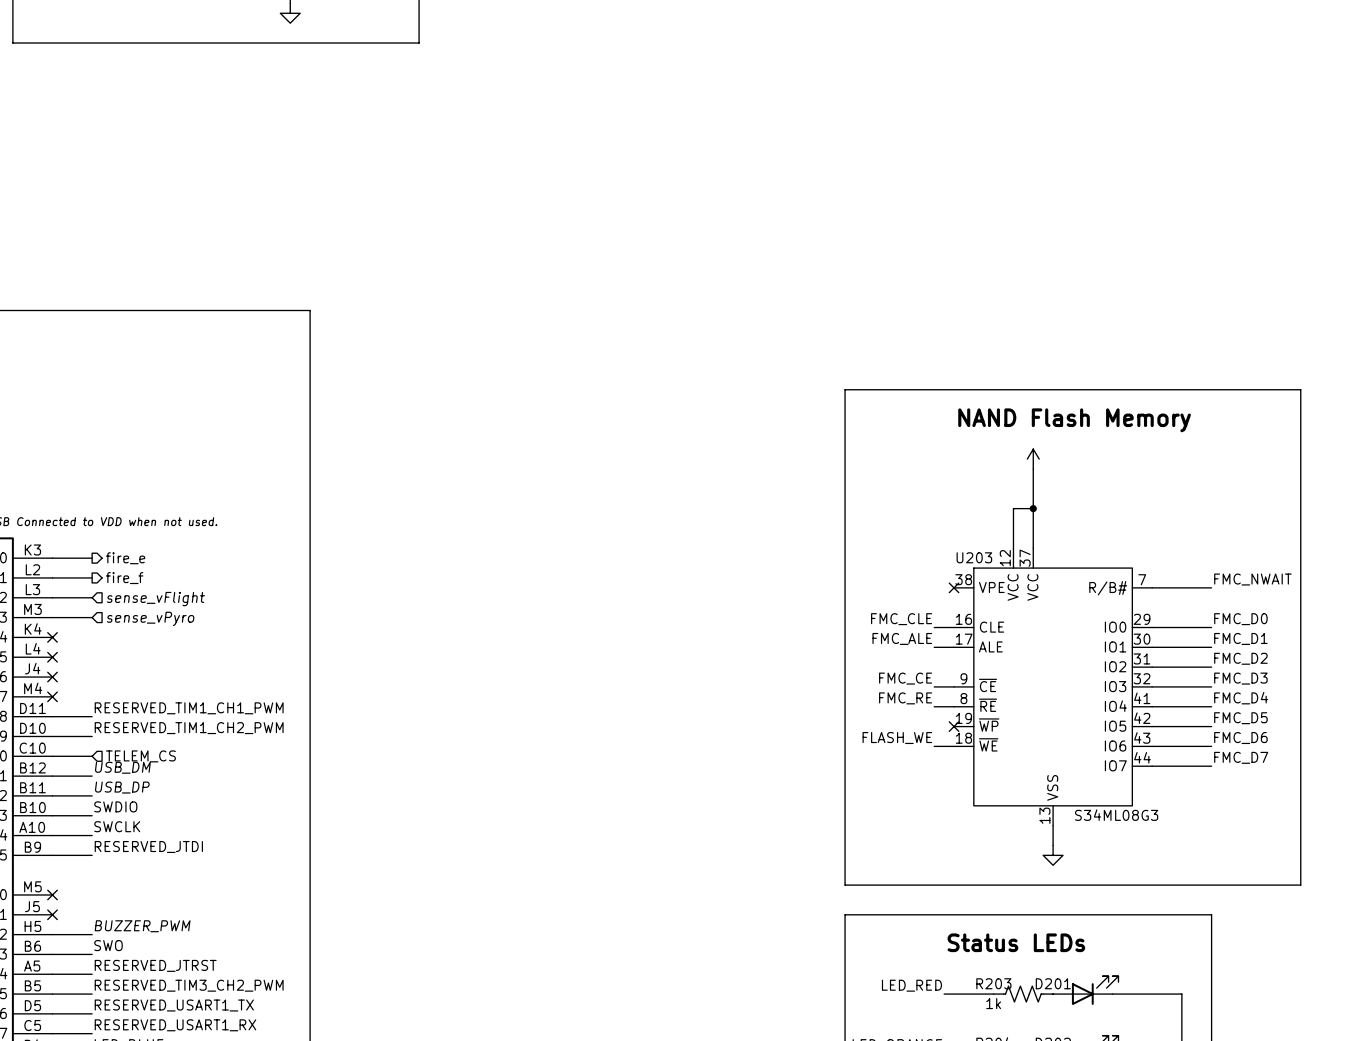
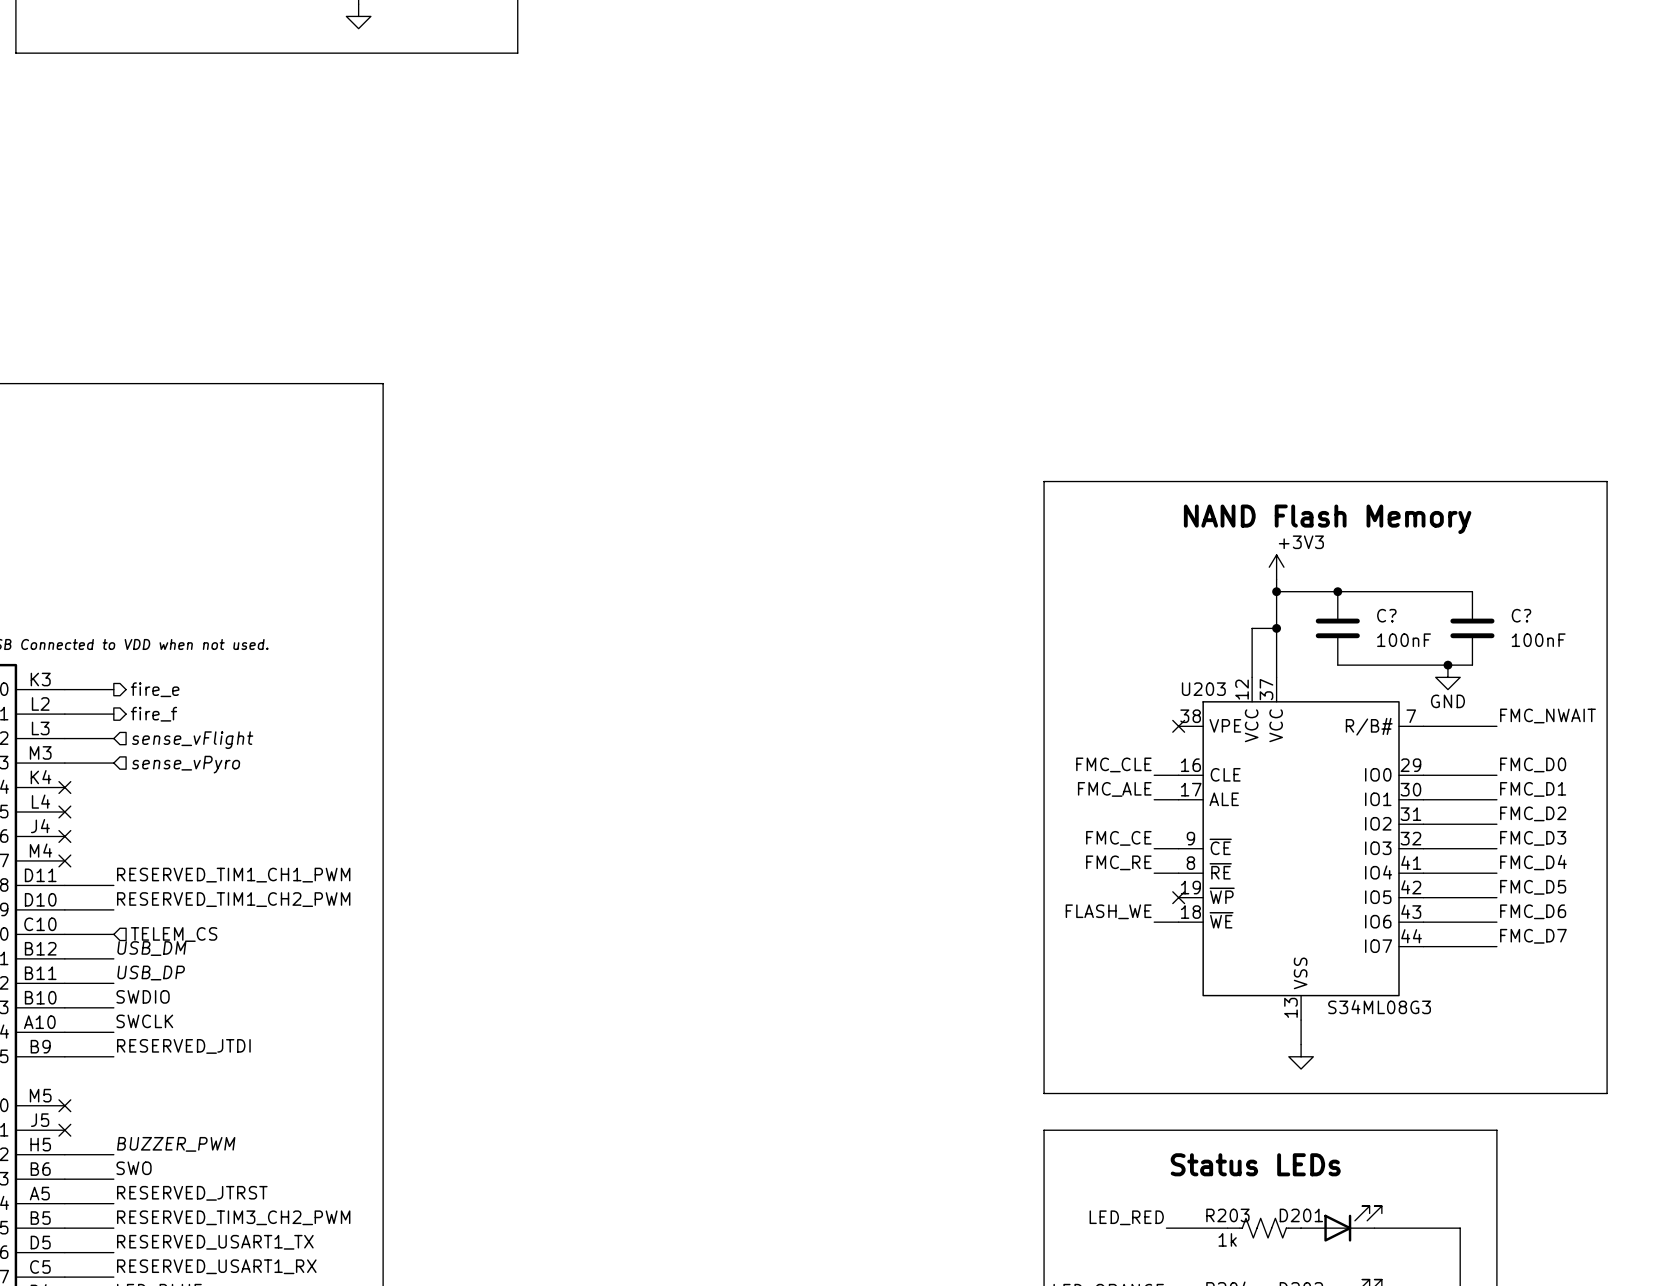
power symbol text: none -> +3V3 (1301, 542)
wire: none -> (1276, 591) (1472, 591)
junction: none -> (1276, 591)
junction: none -> (1337, 591)
C?: none -> 100nF (1337, 628)
C?: none -> 100nF (1472, 628)
wire: none -> (1337, 665) (1472, 665)
junction: none -> (1447, 665)
power symbol: none -> GND (1447, 677)

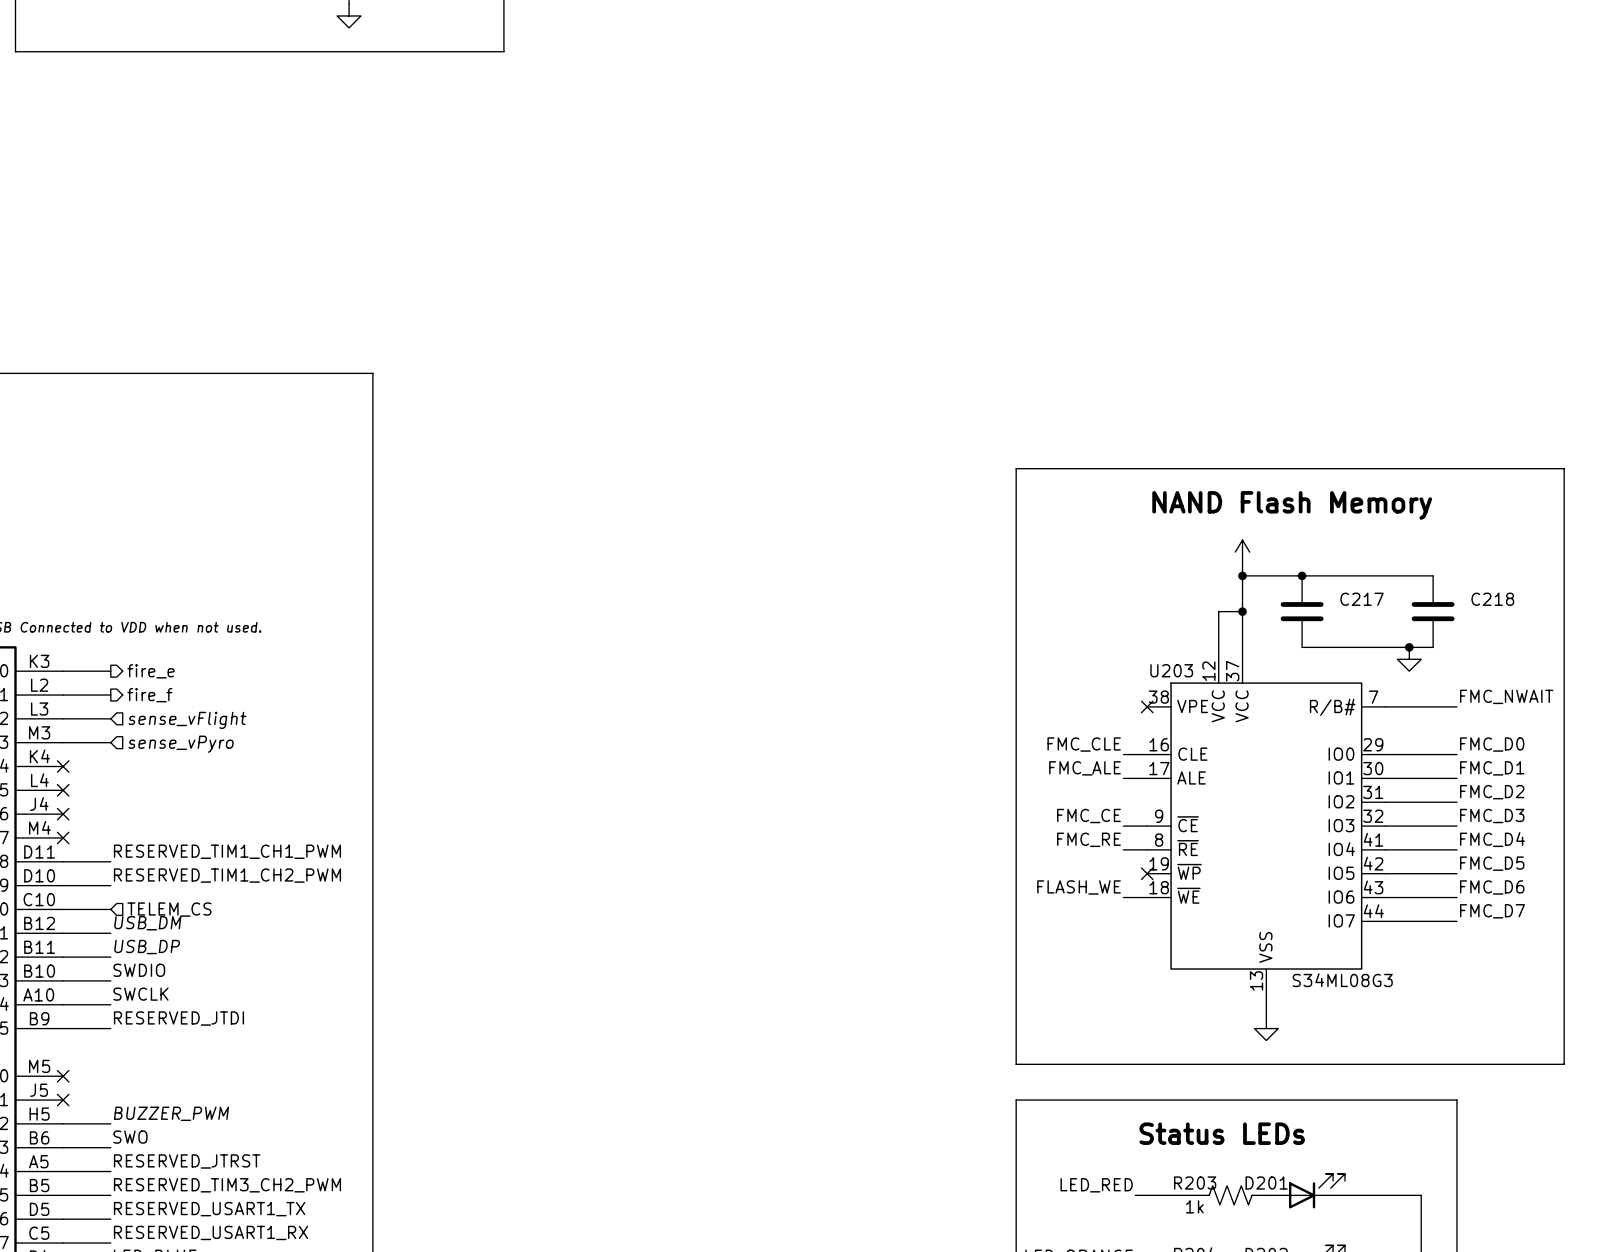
power symbol text: +3V3 (1301, 542) -> none
C? name: C? (1386, 615) -> C217 (1362, 599)
C? name: C? (1521, 615) -> C218 (1492, 599)
C? value: 100nF (1404, 640) -> none
C? value: 100nF (1538, 640) -> none
power symbol text: GND (1447, 701) -> none

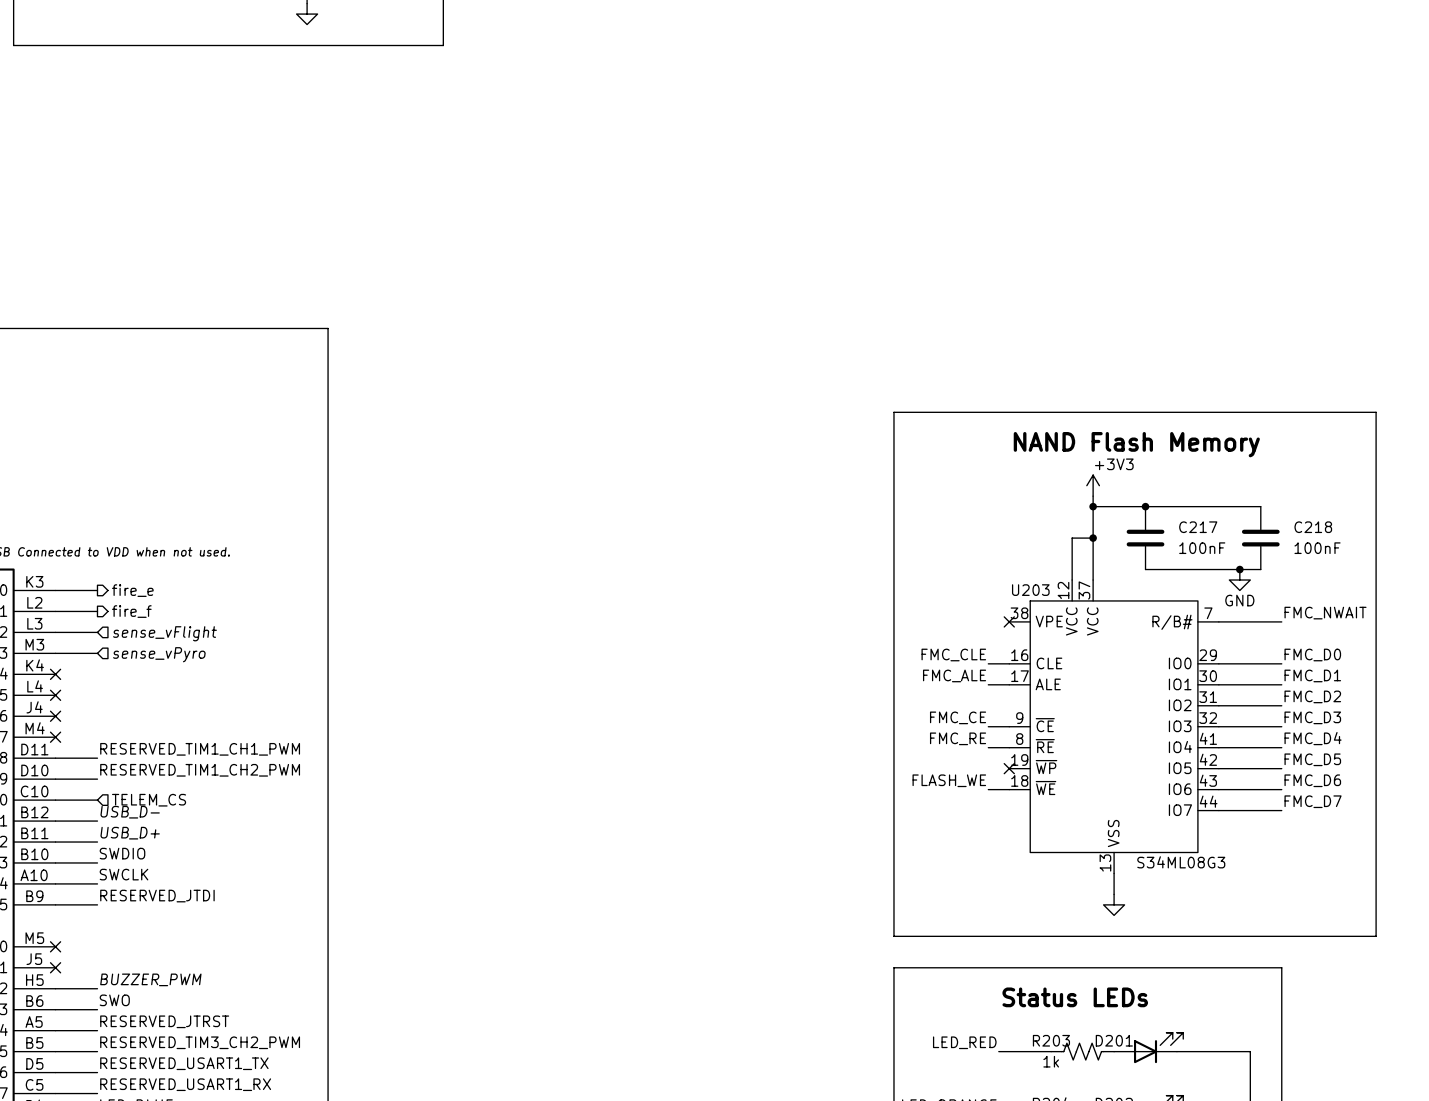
power symbol text: none -> +3V3 (1114, 464)
C217 value: none -> 100nF (1202, 548)
C218 value: none -> 100nF (1317, 548)
power symbol text: none -> GND (1239, 600)
label: USB_DM (147, 923) -> USB_D- (130, 812)
label: USB_DP (147, 947) -> USB_D+ (130, 833)

